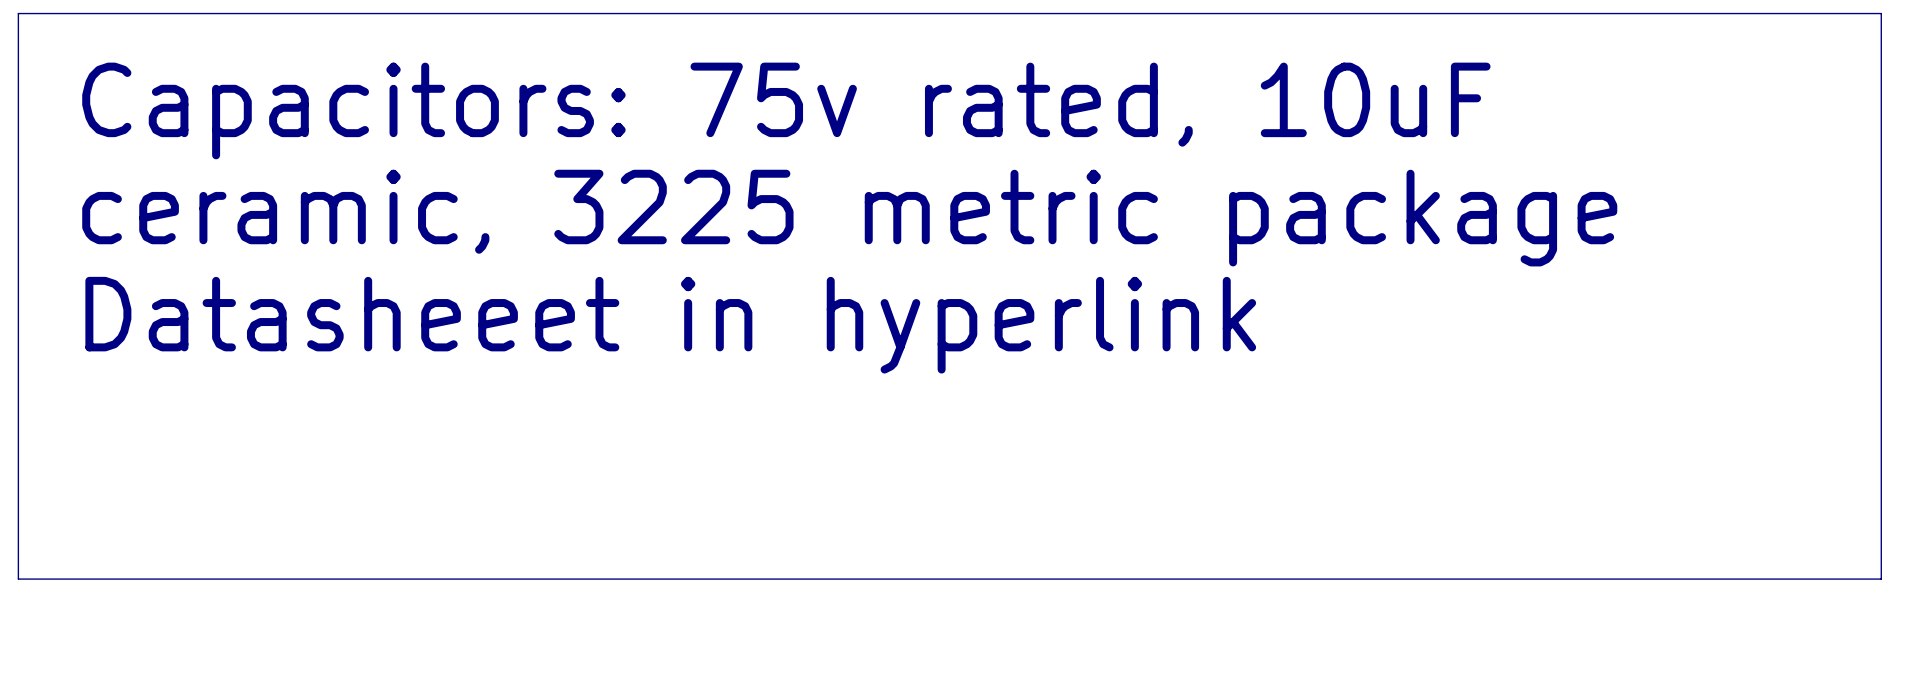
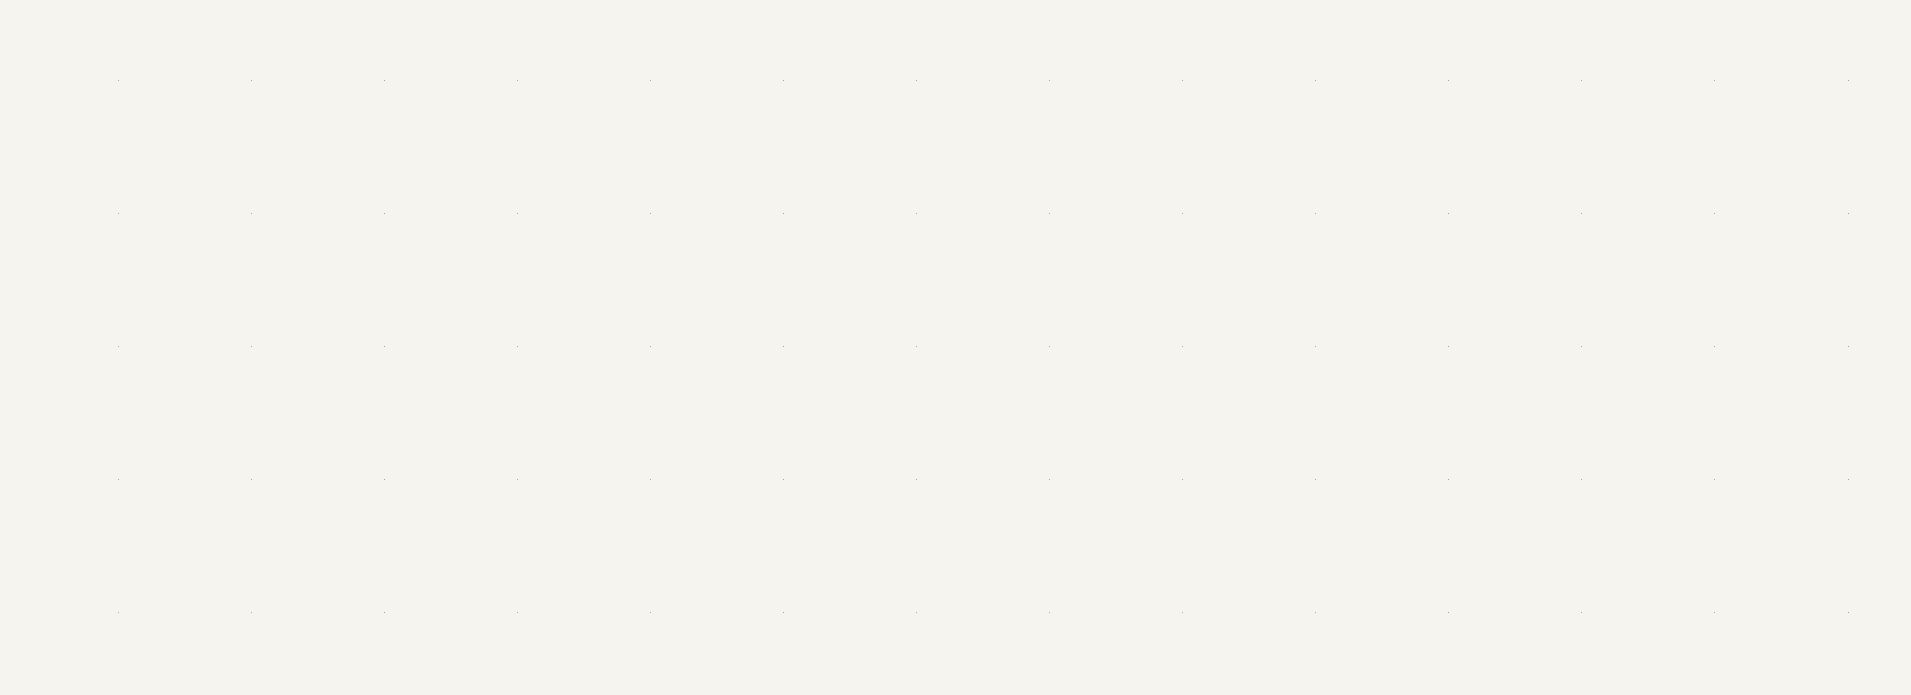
line: (18, 13) (1881, 13) (1881, 579) (18, 579) (18, 13) -> none
text: Capacitors: 75v rated, 10uF (786, 110) -> none
text: ceramic, 3225 metric package (849, 218) -> none
text: Datasheeet in hyperlink (670, 325) -> none

